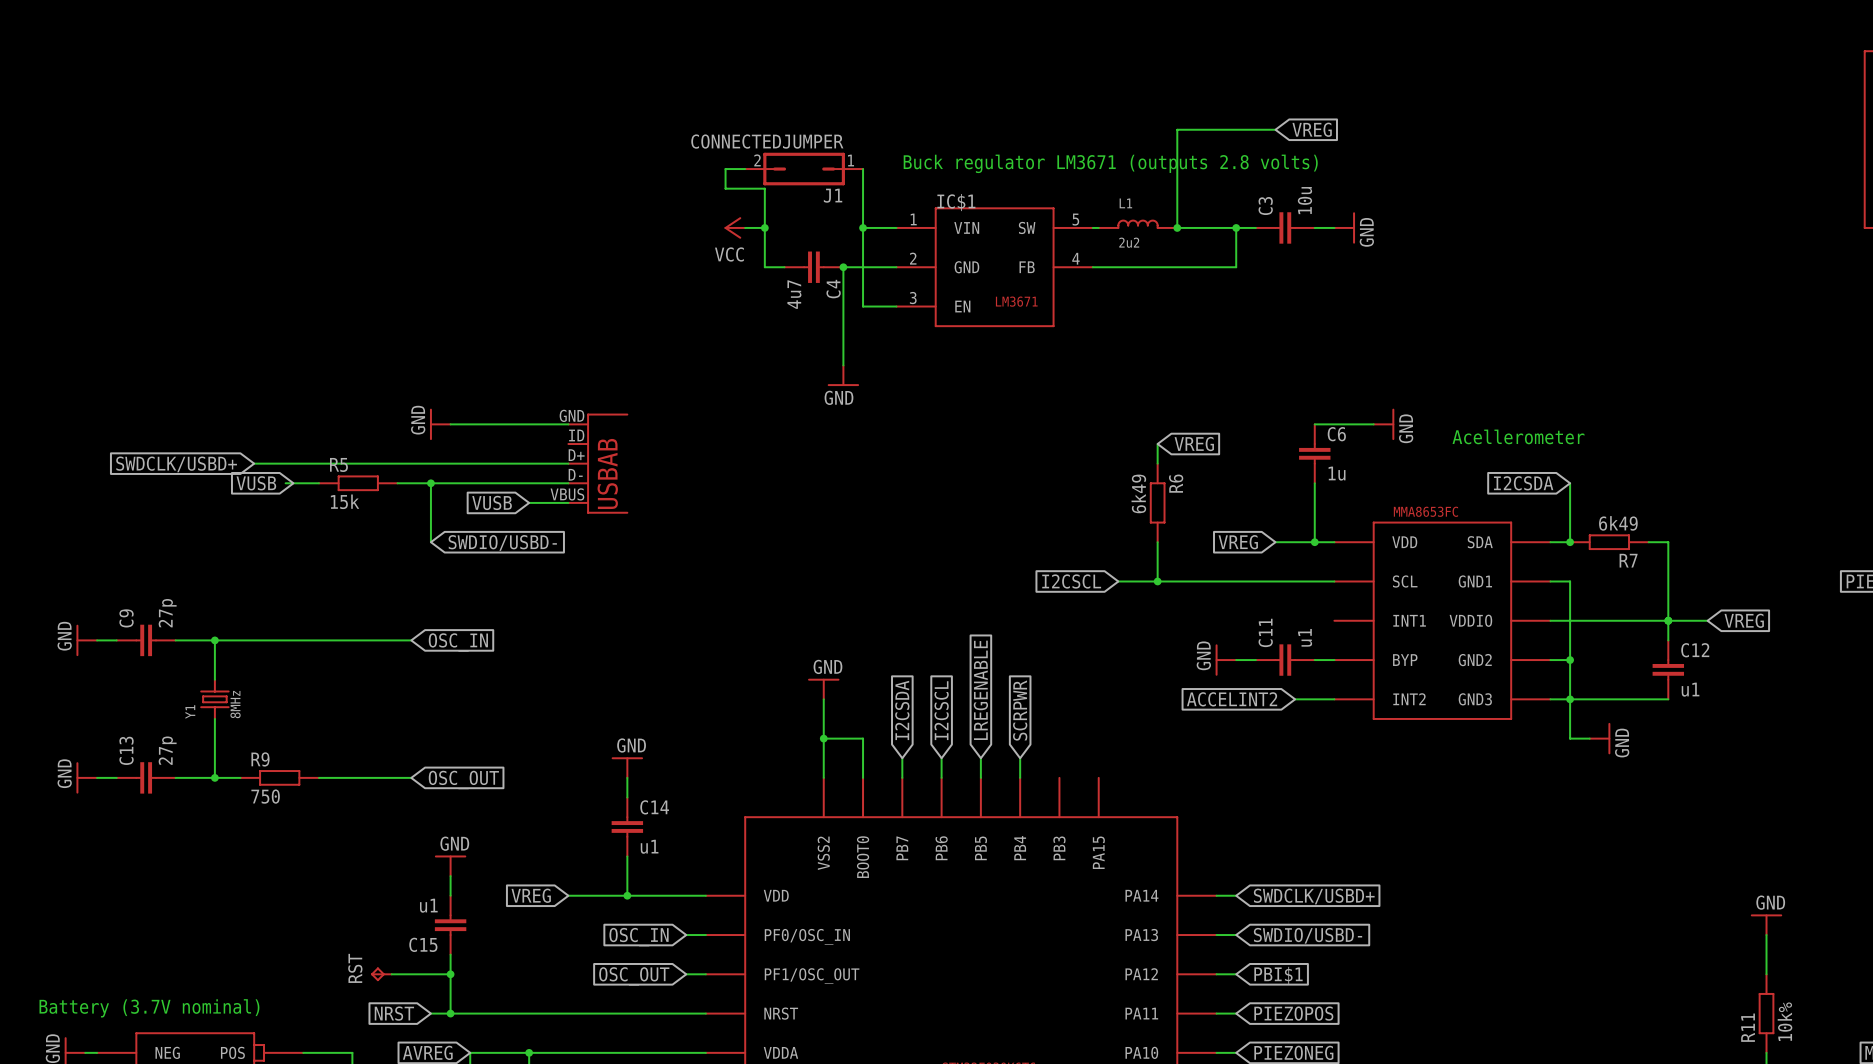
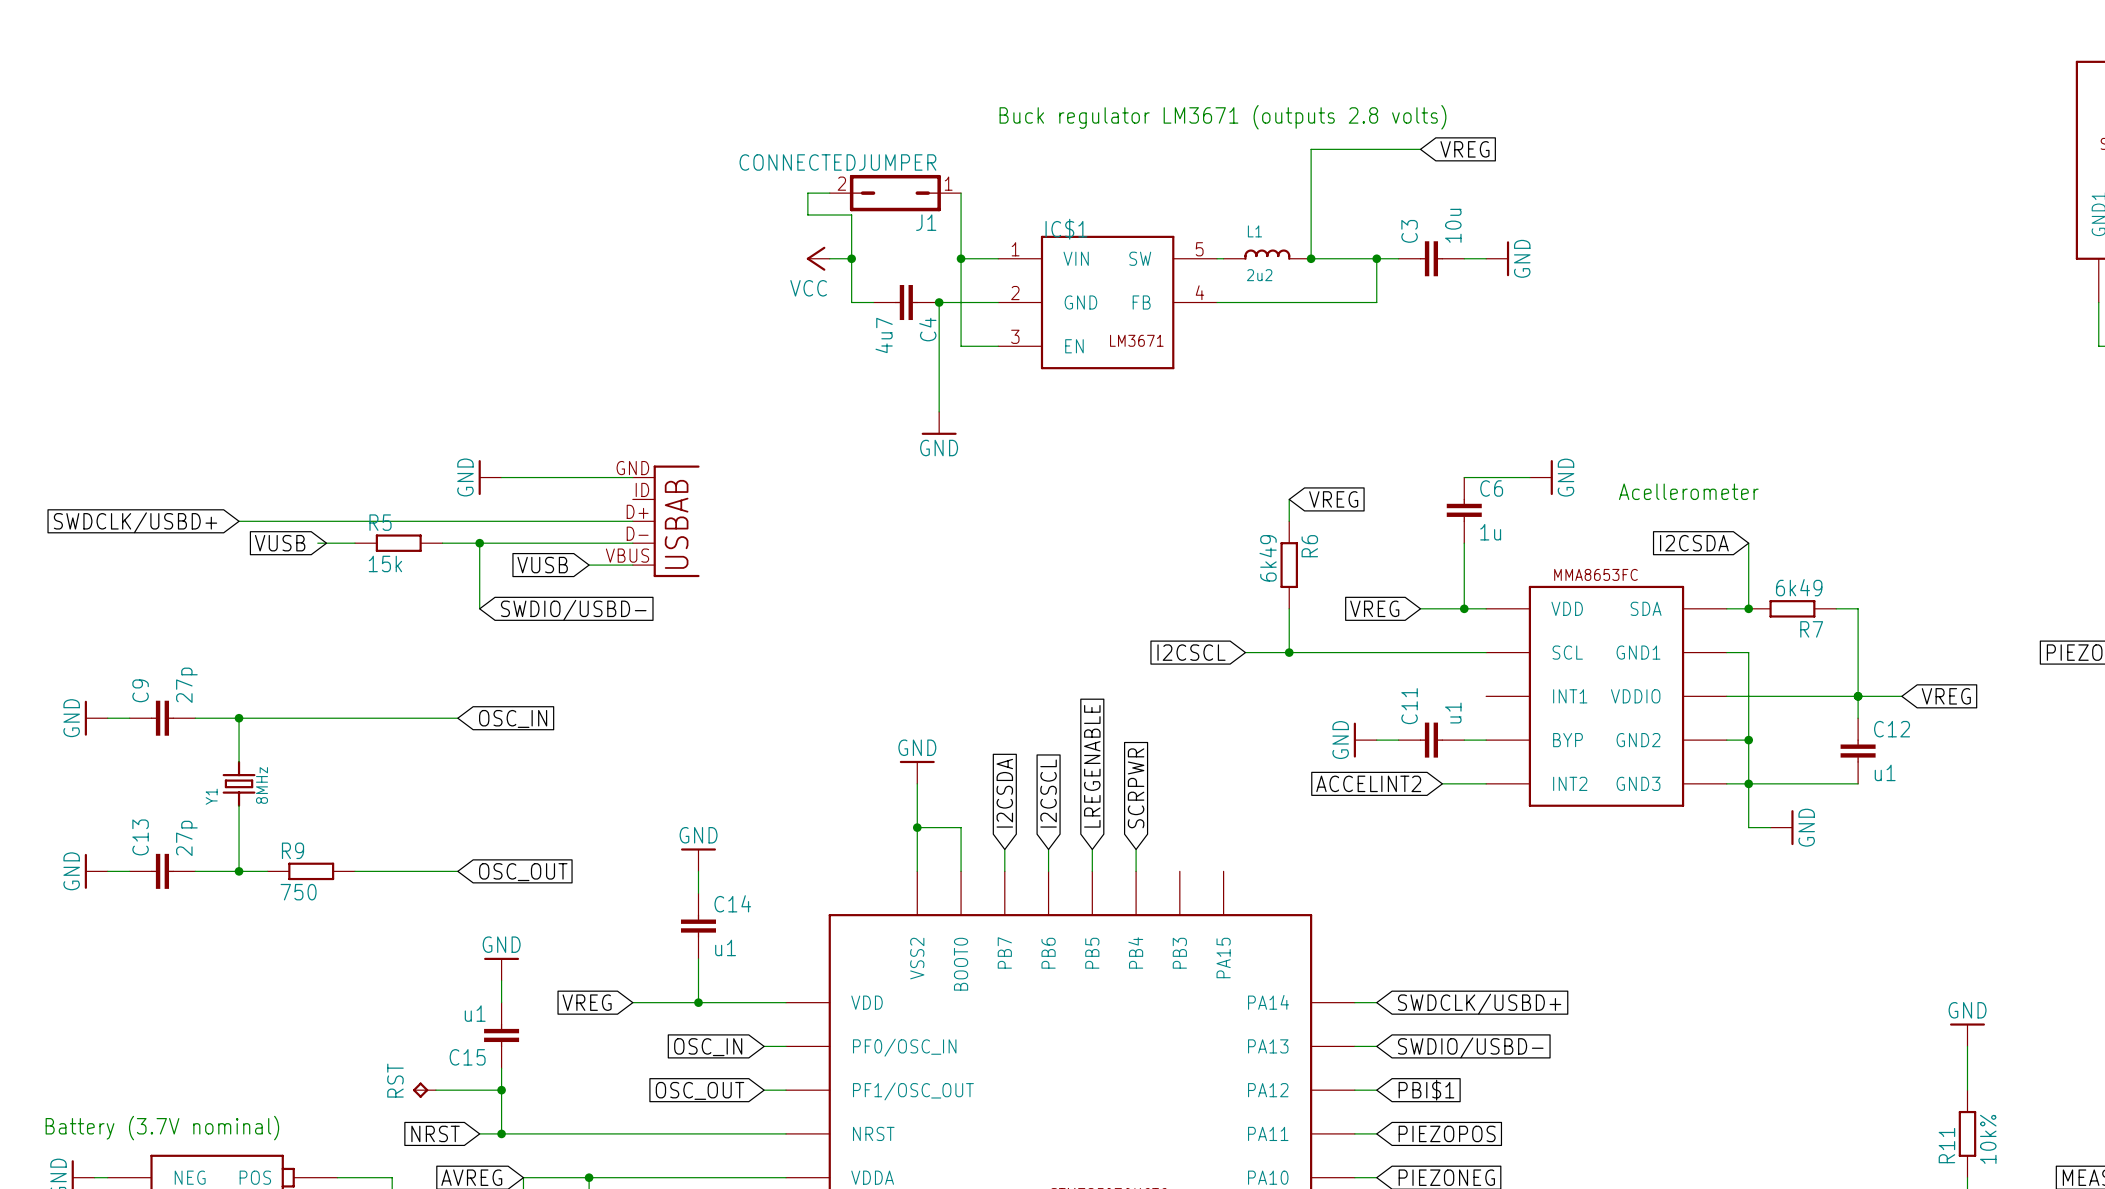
text position: Buck regulator LM3671 (outputs 2.8 volts) (1110, 163) -> Buck regulator LM3671 (outputs 2.8 volts) (1222, 117)
wire: none -> (239, 521) (282, 521)
global label position: SWDCLK/USBD+ (176, 464) -> SWDCLK/USBD+ (135, 522)

